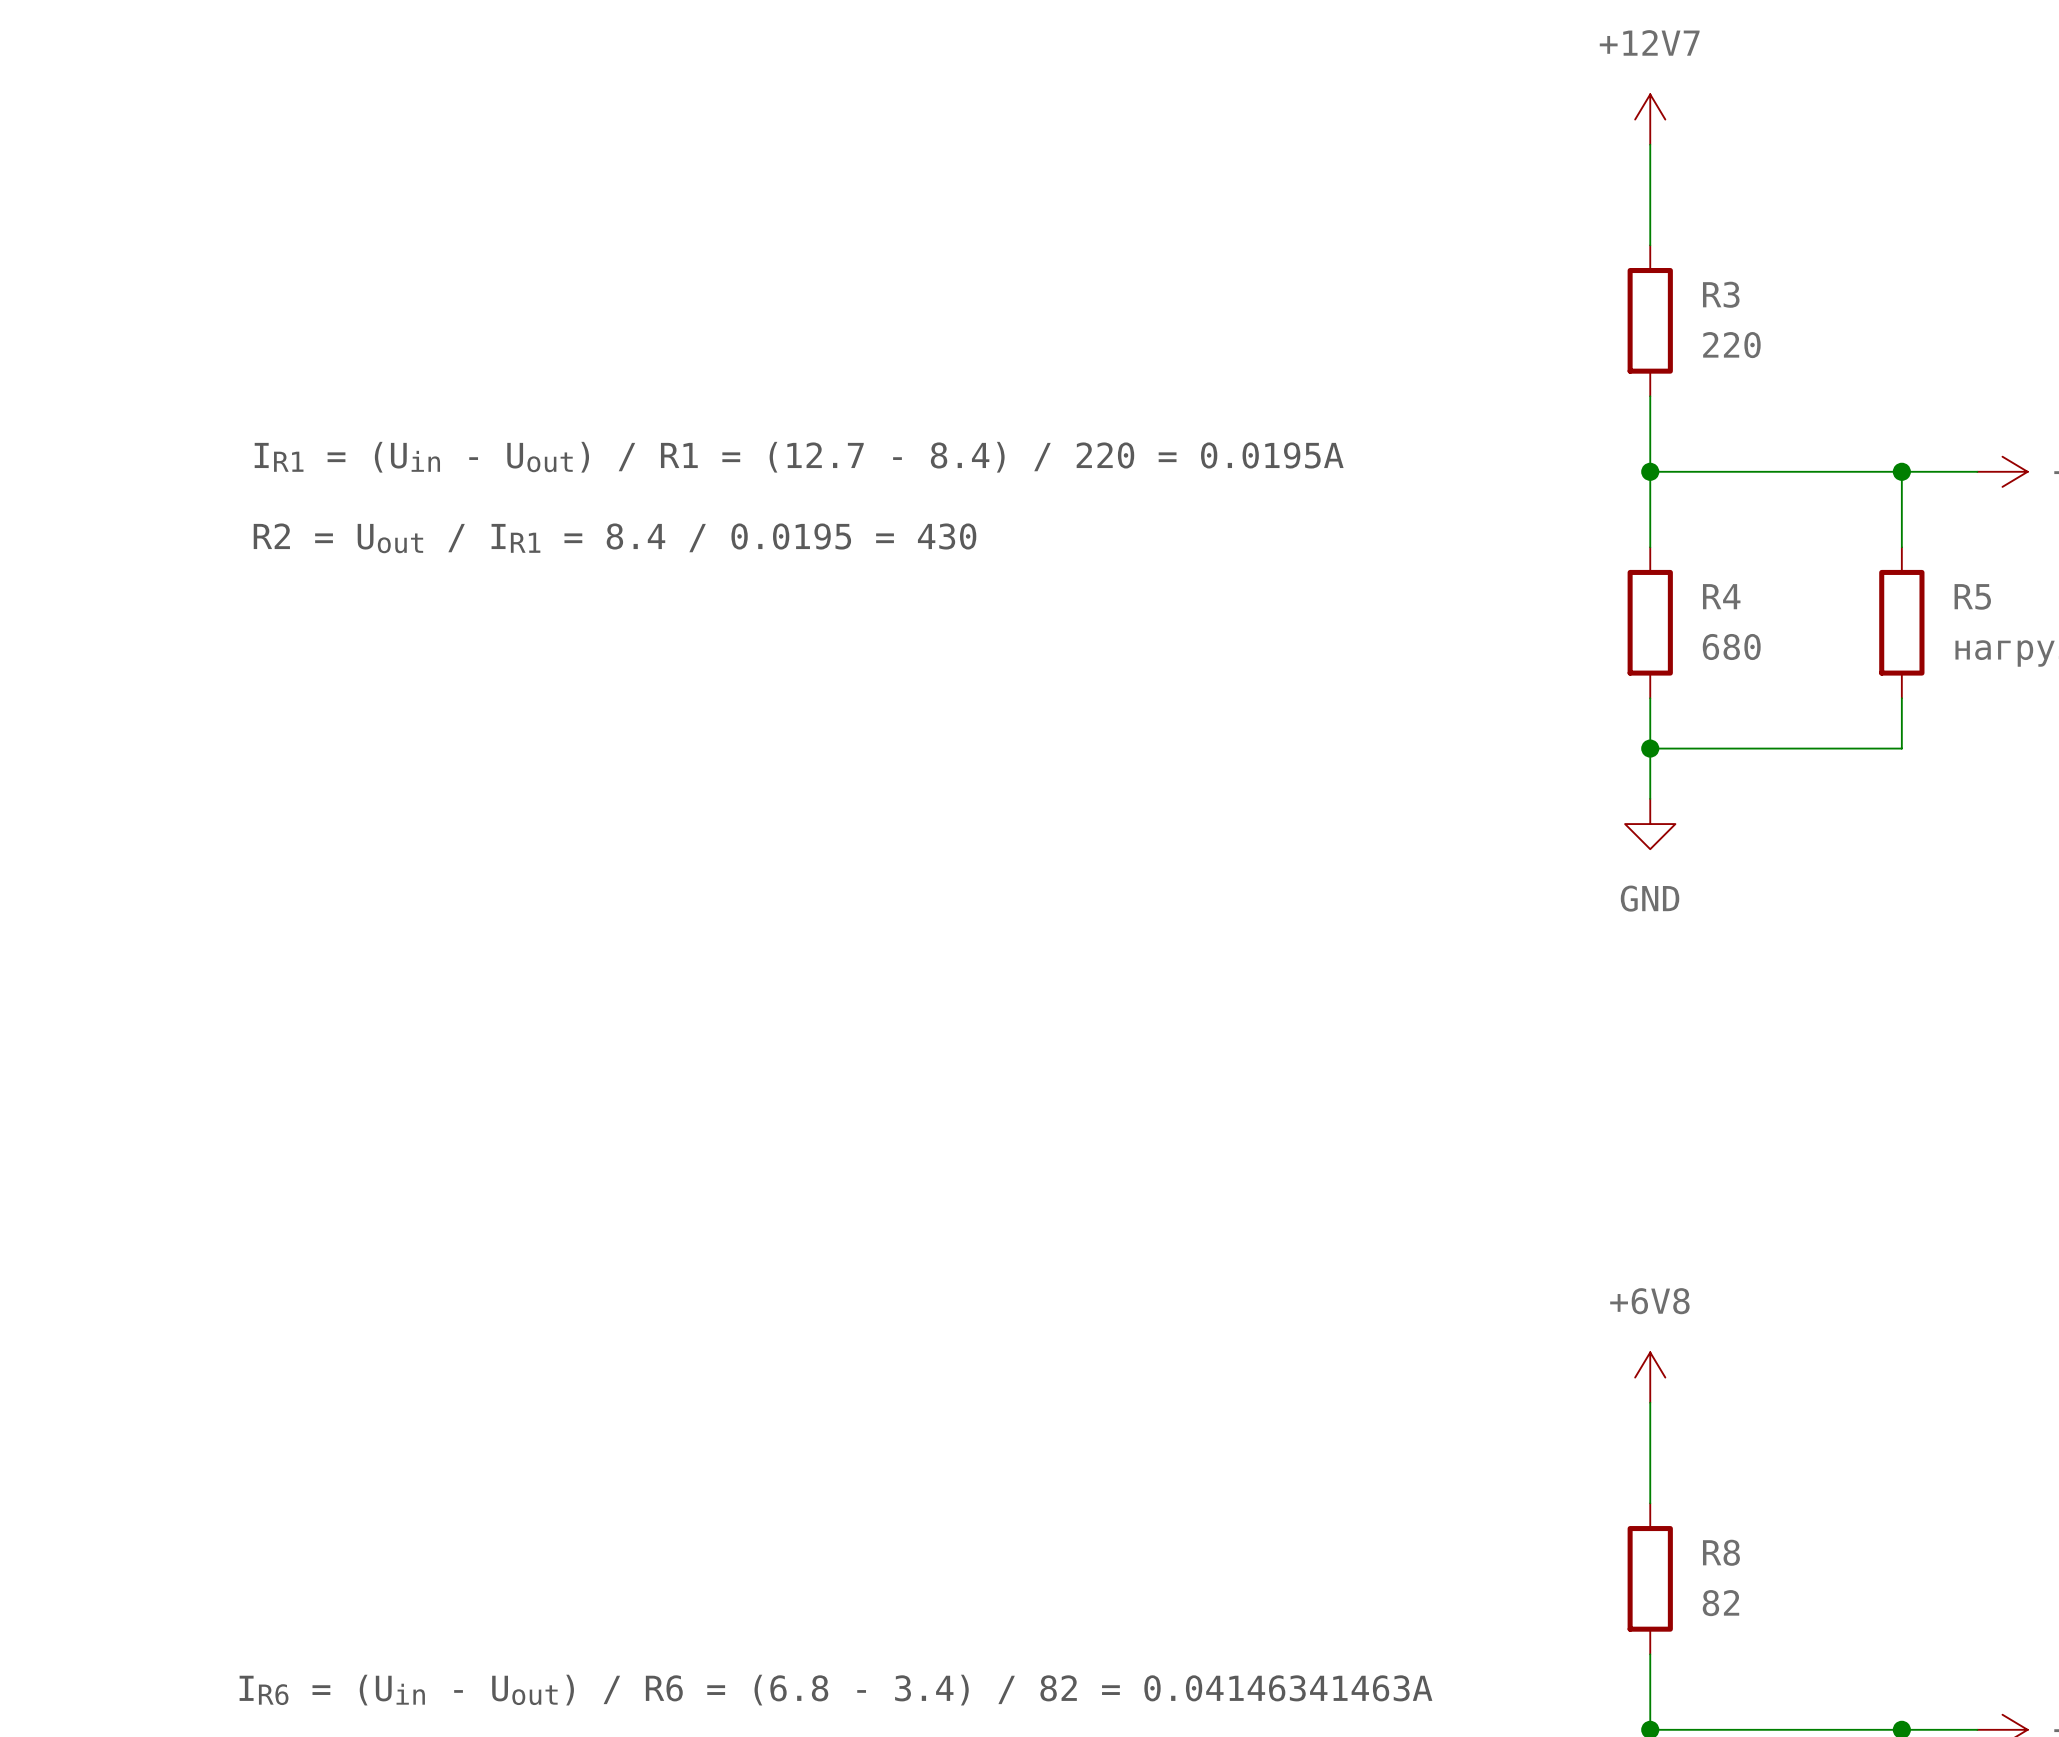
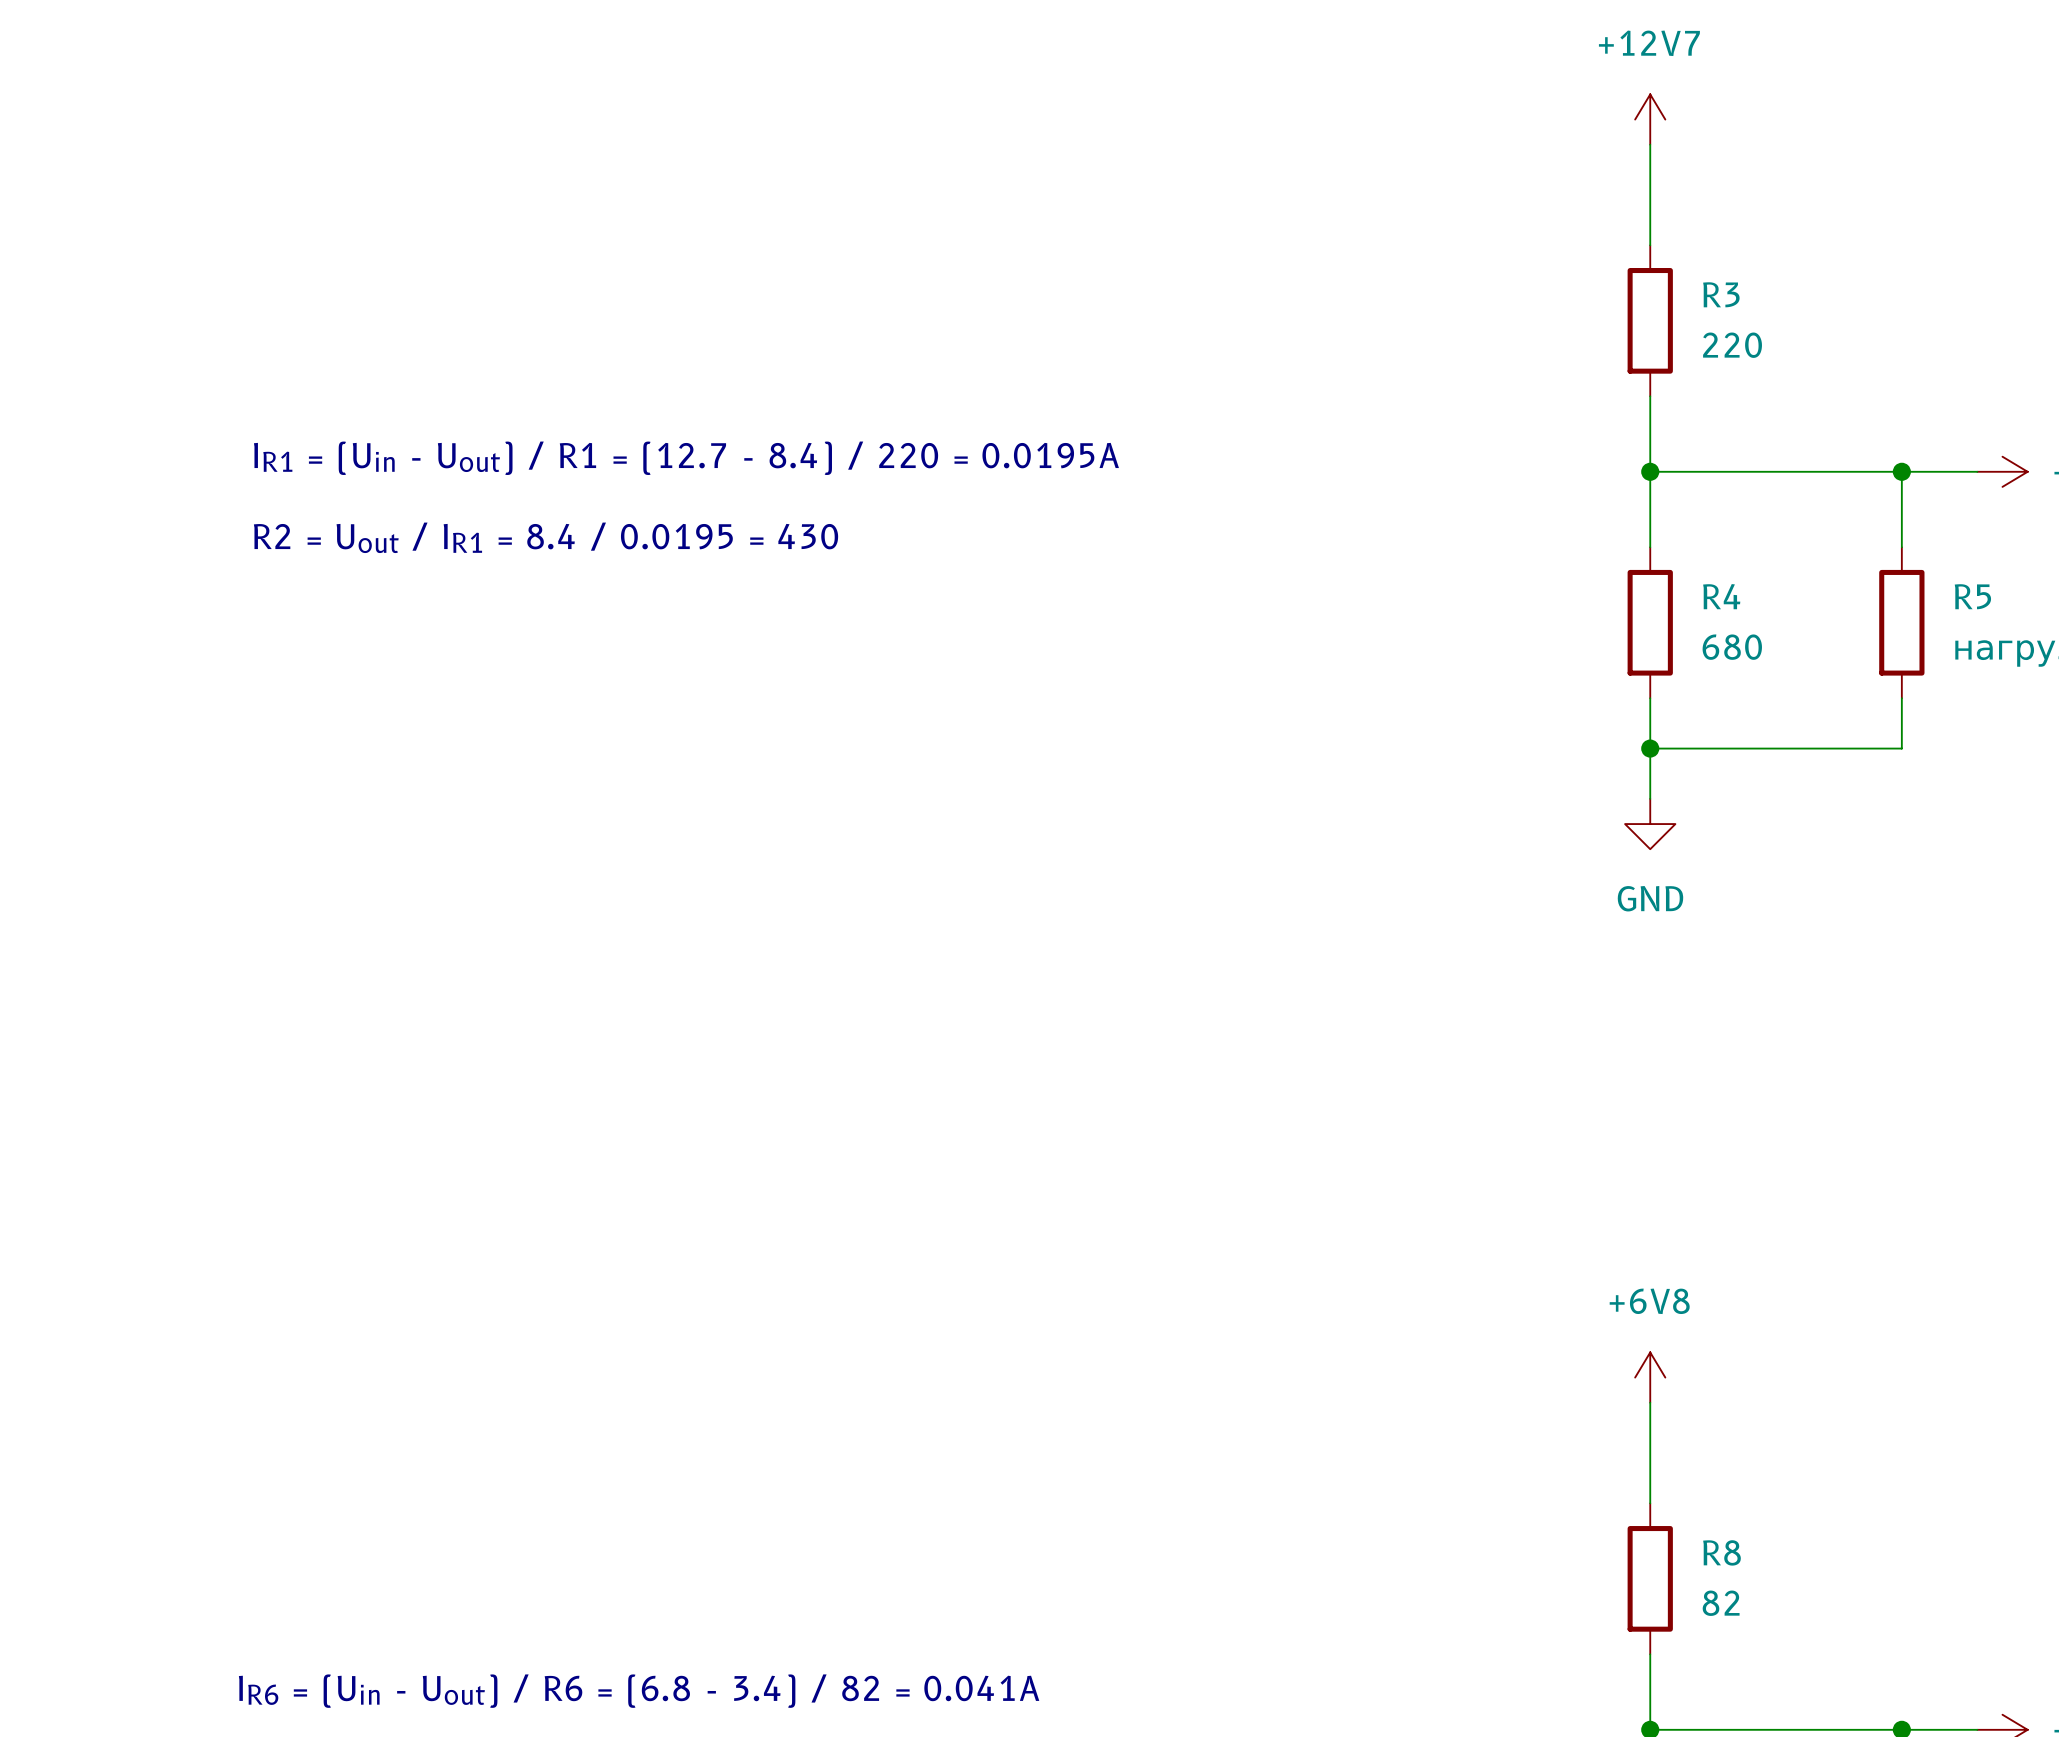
text: IR6 = (Uin - Uout) / R6 = (6.8 - 3.4) / 82 = 0.04146341463A (835, 1690) -> IR6 = (Uin - Uout) / R6 = (6.8 - 3.4) / 82 = 0.041A (639, 1691)

